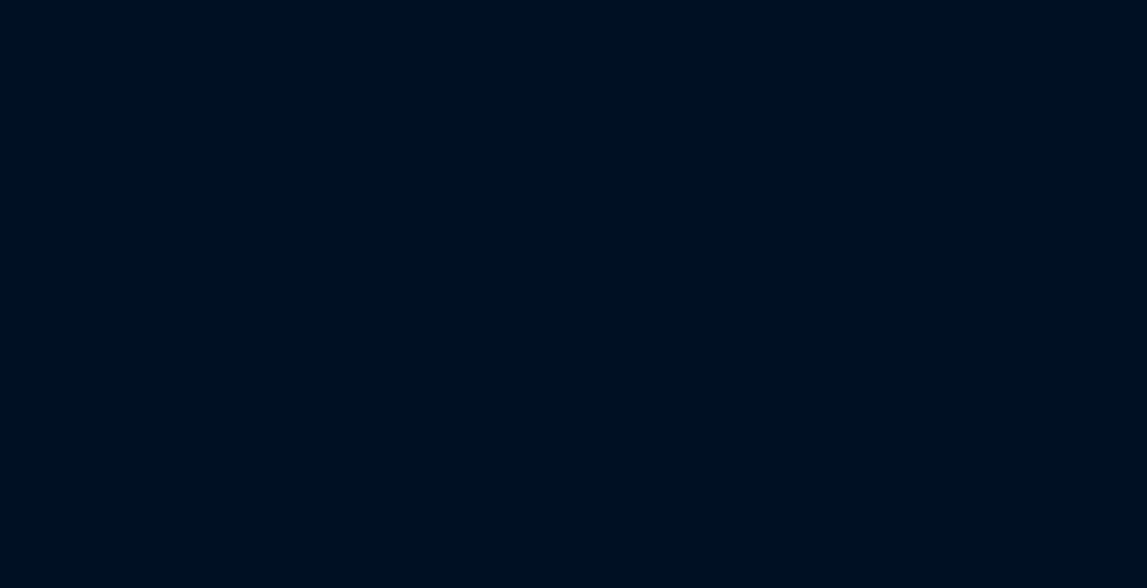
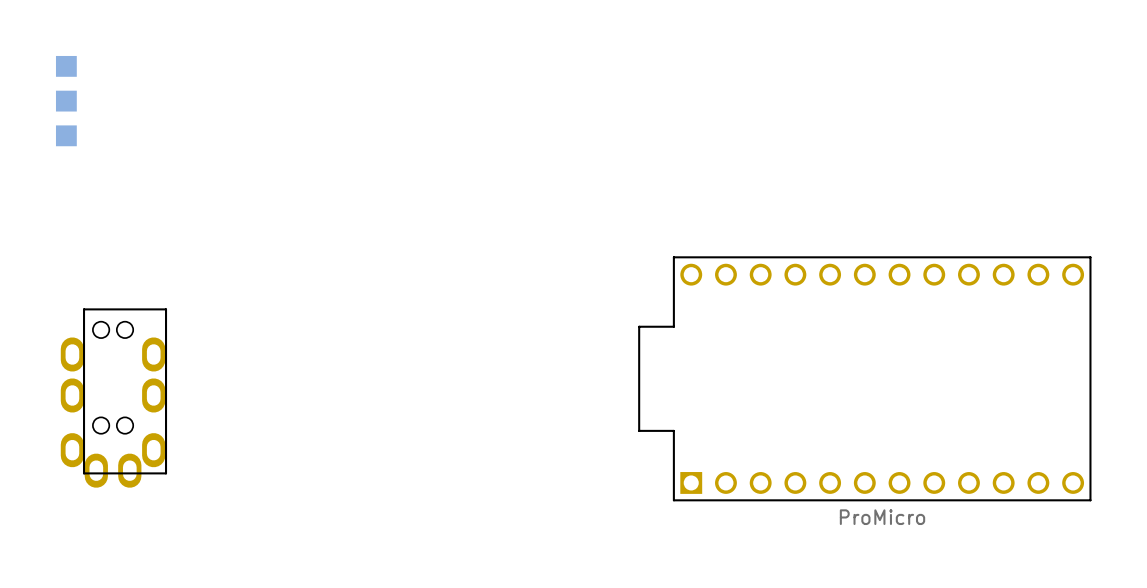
part: none -> (66, 101)
part: none -> ProMicro (864, 378)
part: none -> (113, 398)

